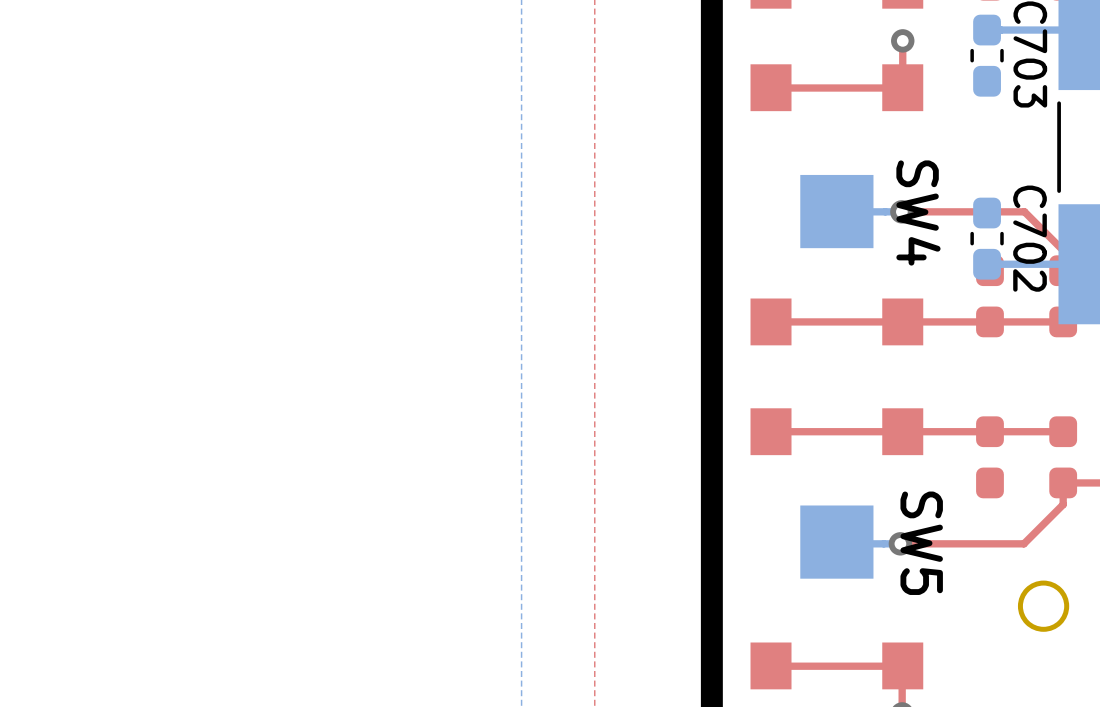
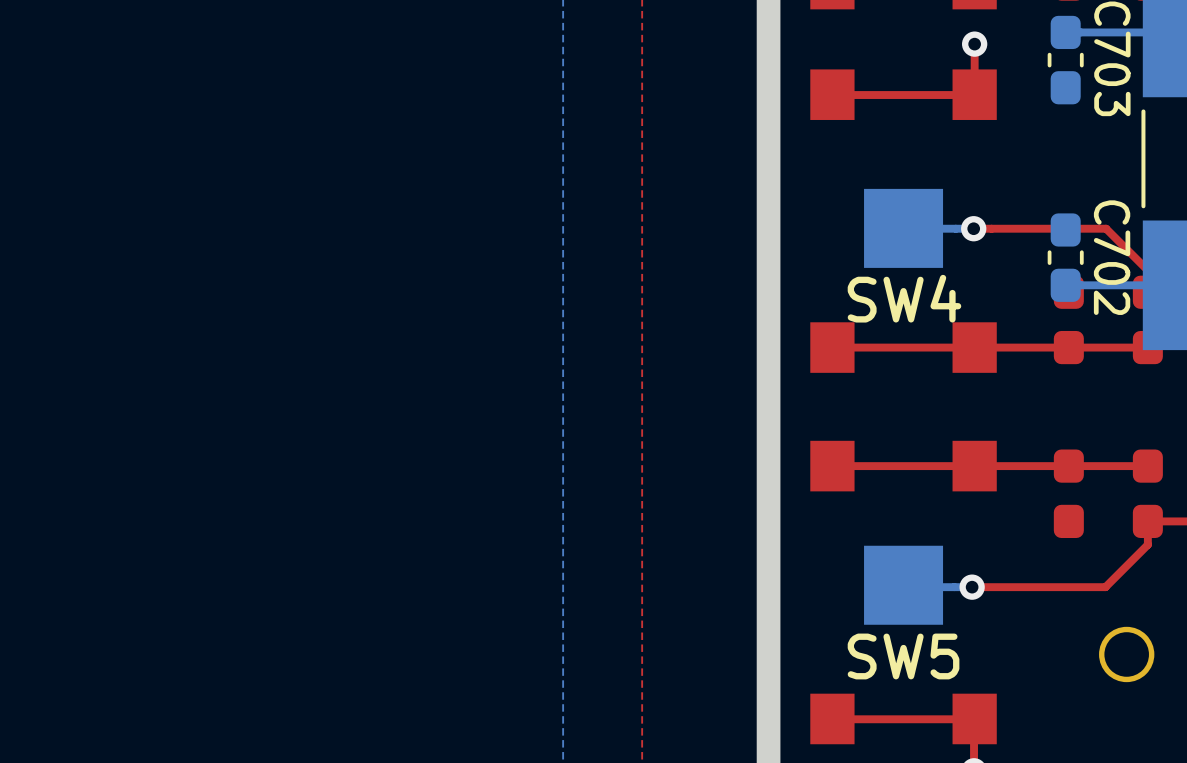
part text rotation: 0° (918, 213) -> 90° counterclockwise (904, 298)
part text rotation: 0° (921, 543) -> 90° counterclockwise (903, 656)

